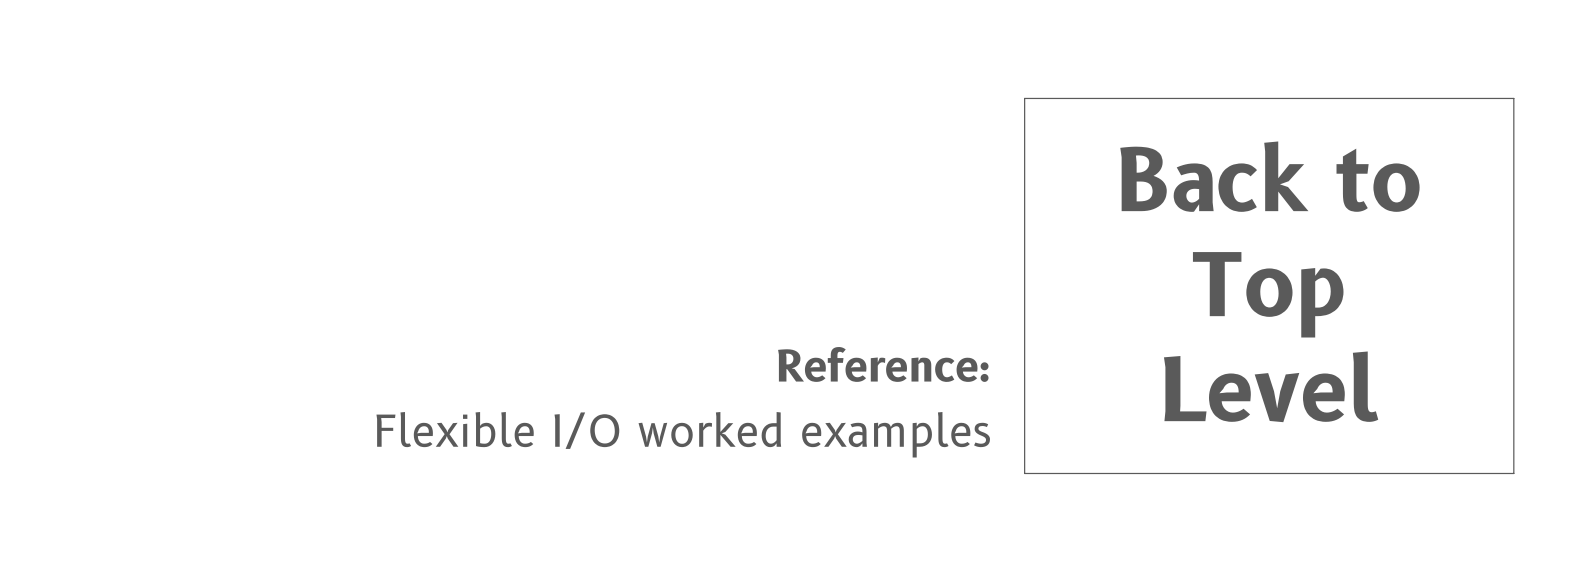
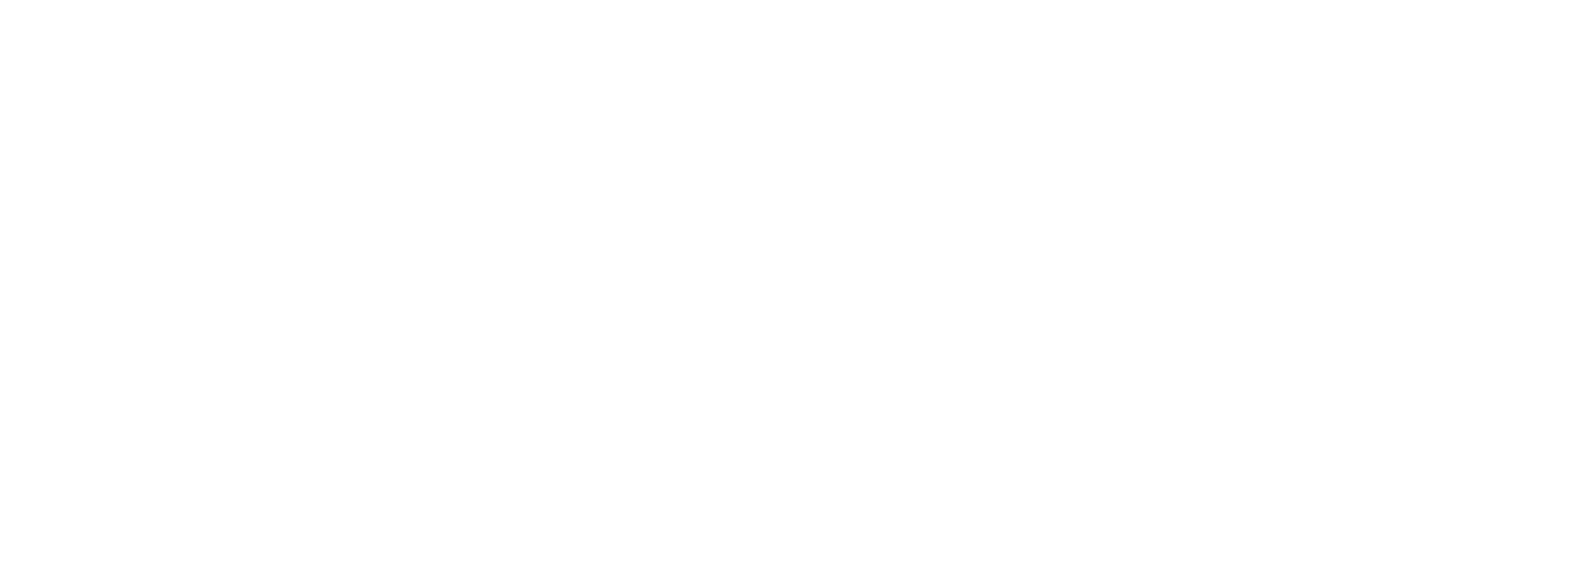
line: (1024, 98) (1513, 98) (1513, 473) (1024, 473) (1024, 98) -> none
text: Back to (1269, 176) -> none
text: Top (1268, 294) -> none
text: Reference: (883, 364) -> none
text: Level (1271, 386) -> none
text: Flexible I/O worked examples (683, 434) -> none

